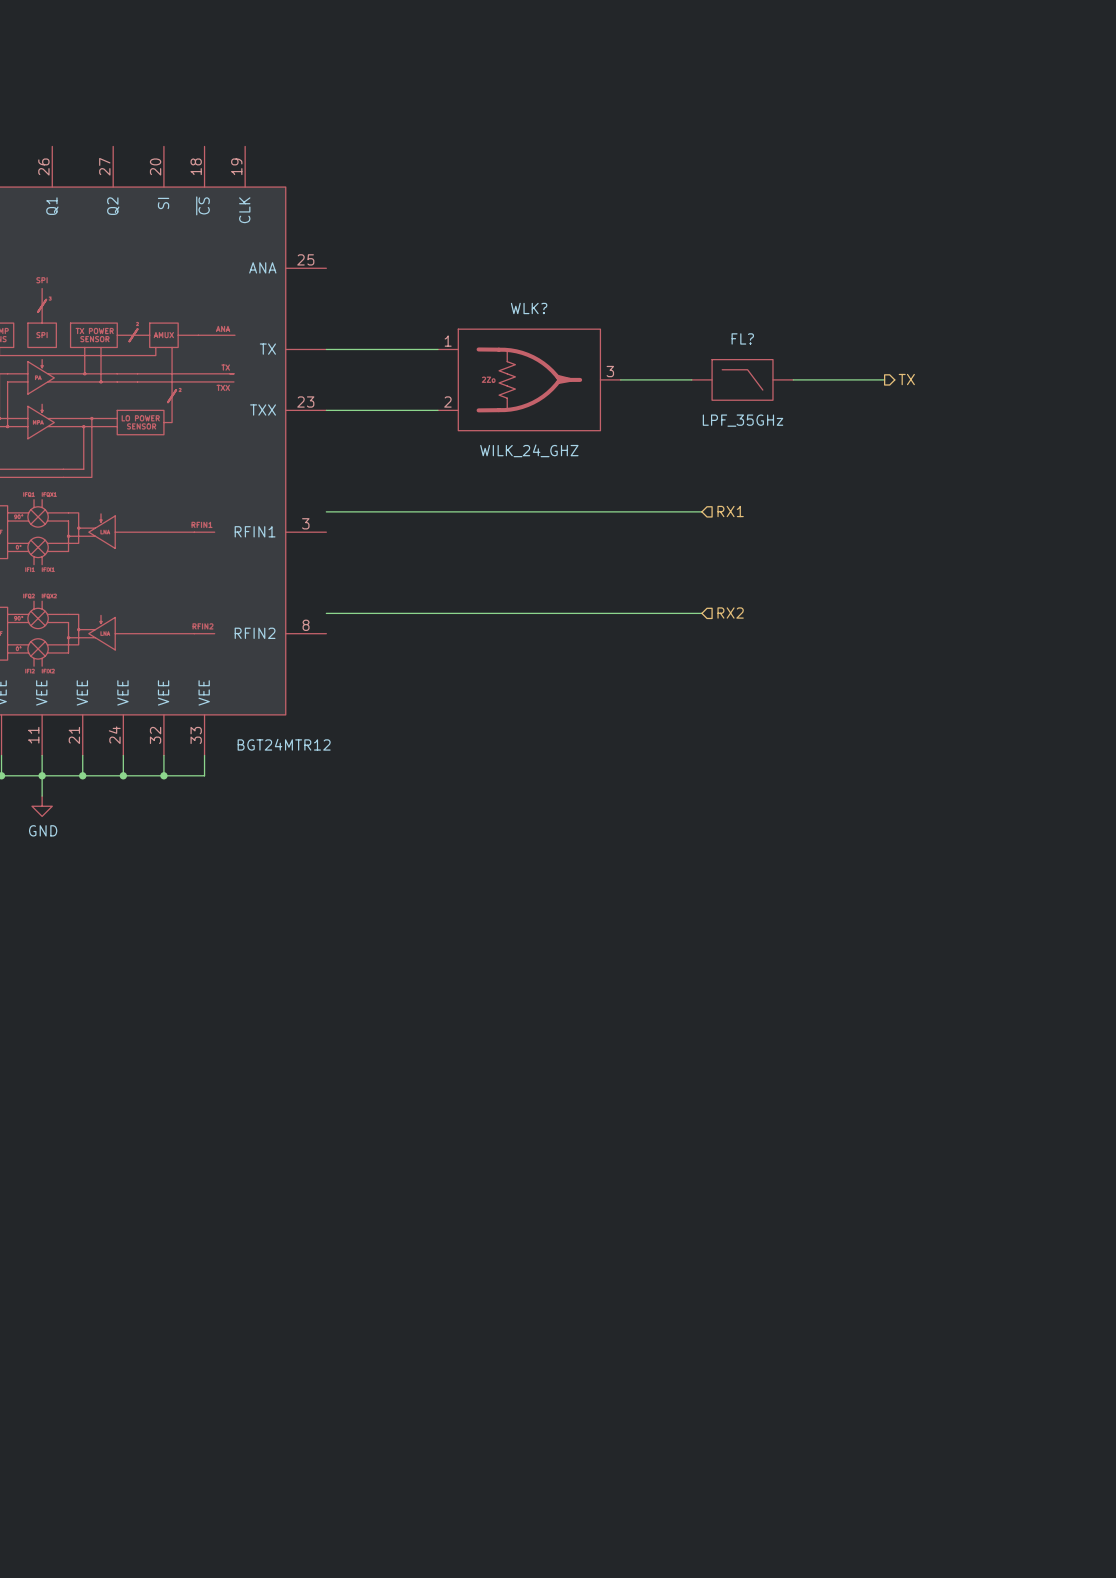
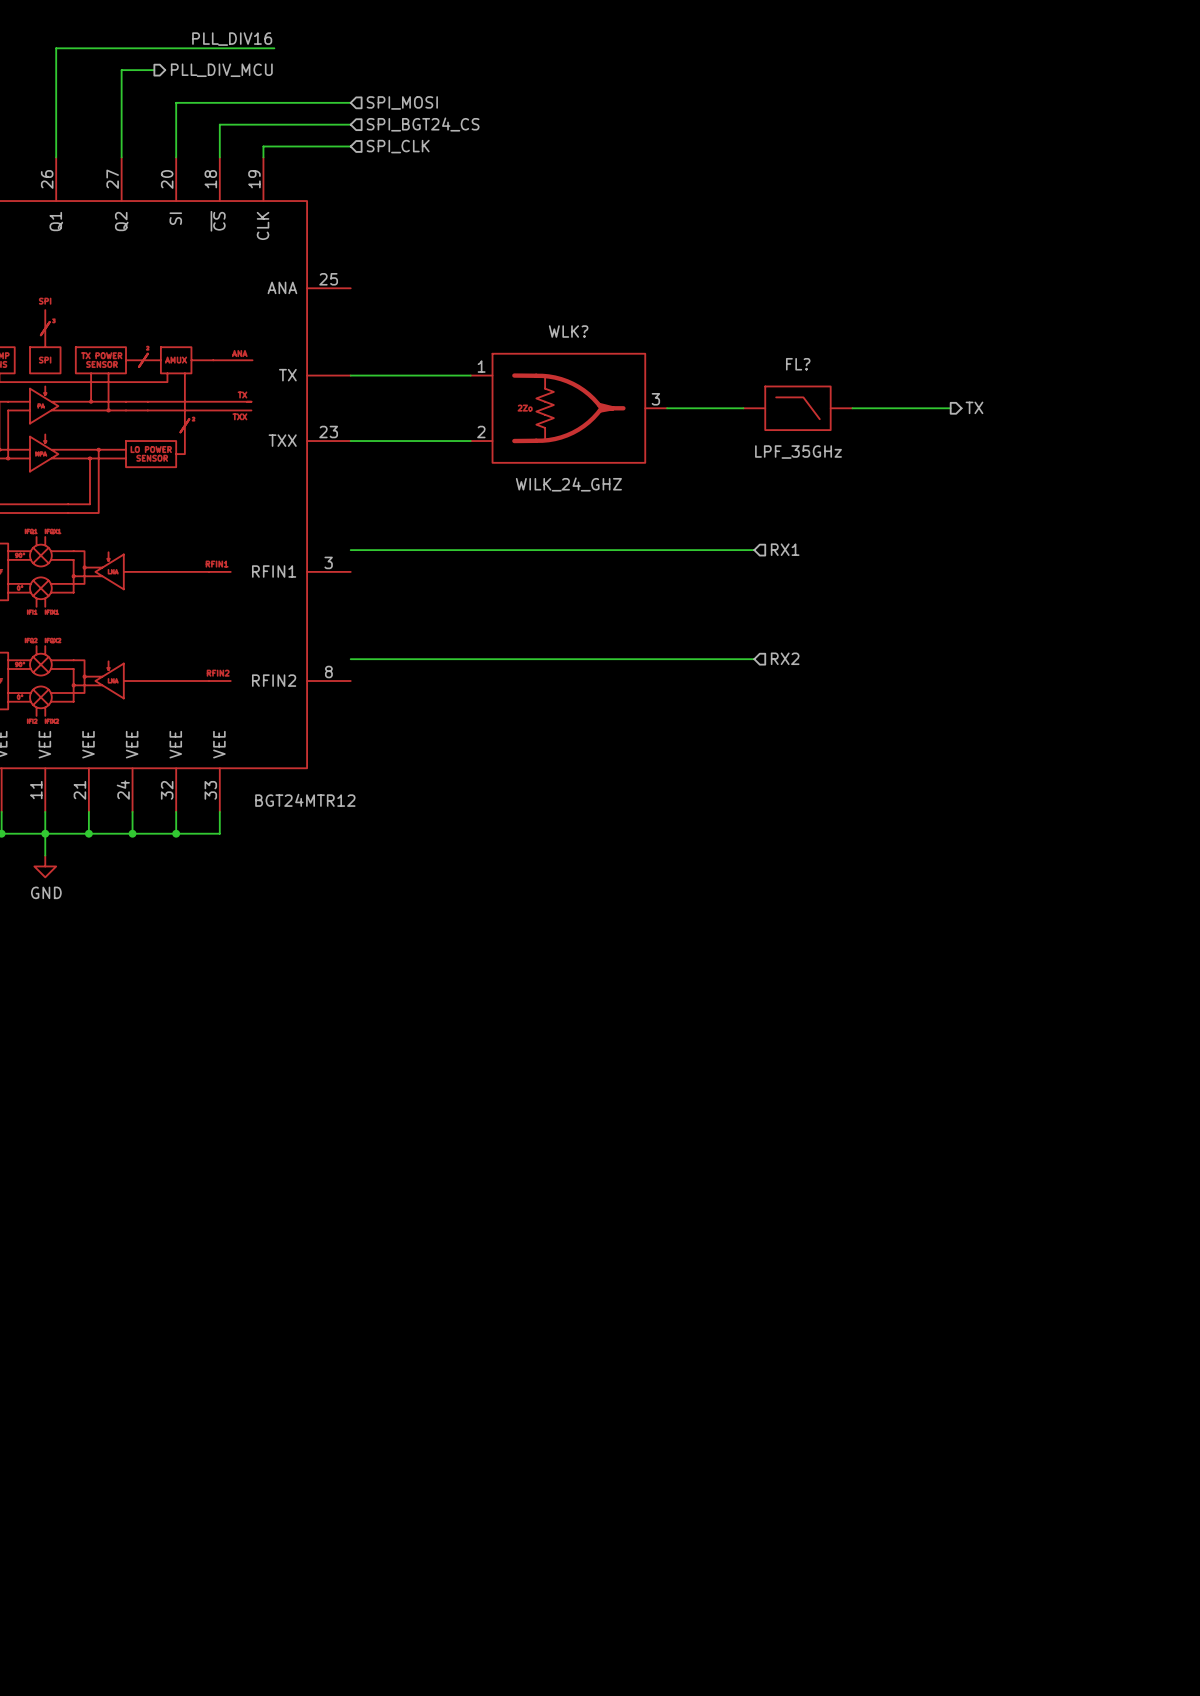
label: none -> PLL_DIV16 (232, 39)
wire: none -> (274, 48) (56, 48) (56, 157)
wire: none -> (154, 70) (121, 70) (121, 157)
hierarchical label: none -> PLL_DIV_MCU (221, 70)
wire: none -> (350, 102) (176, 102) (176, 157)
hierarchical label: none -> SPI_MOSI (402, 102)
hierarchical label: none -> SPI_BGT24_CS (423, 124)
wire: none -> (350, 124) (219, 124) (219, 157)
wire: none -> (350, 146) (263, 146) (263, 157)
hierarchical label: none -> SPI_CLK (398, 146)

